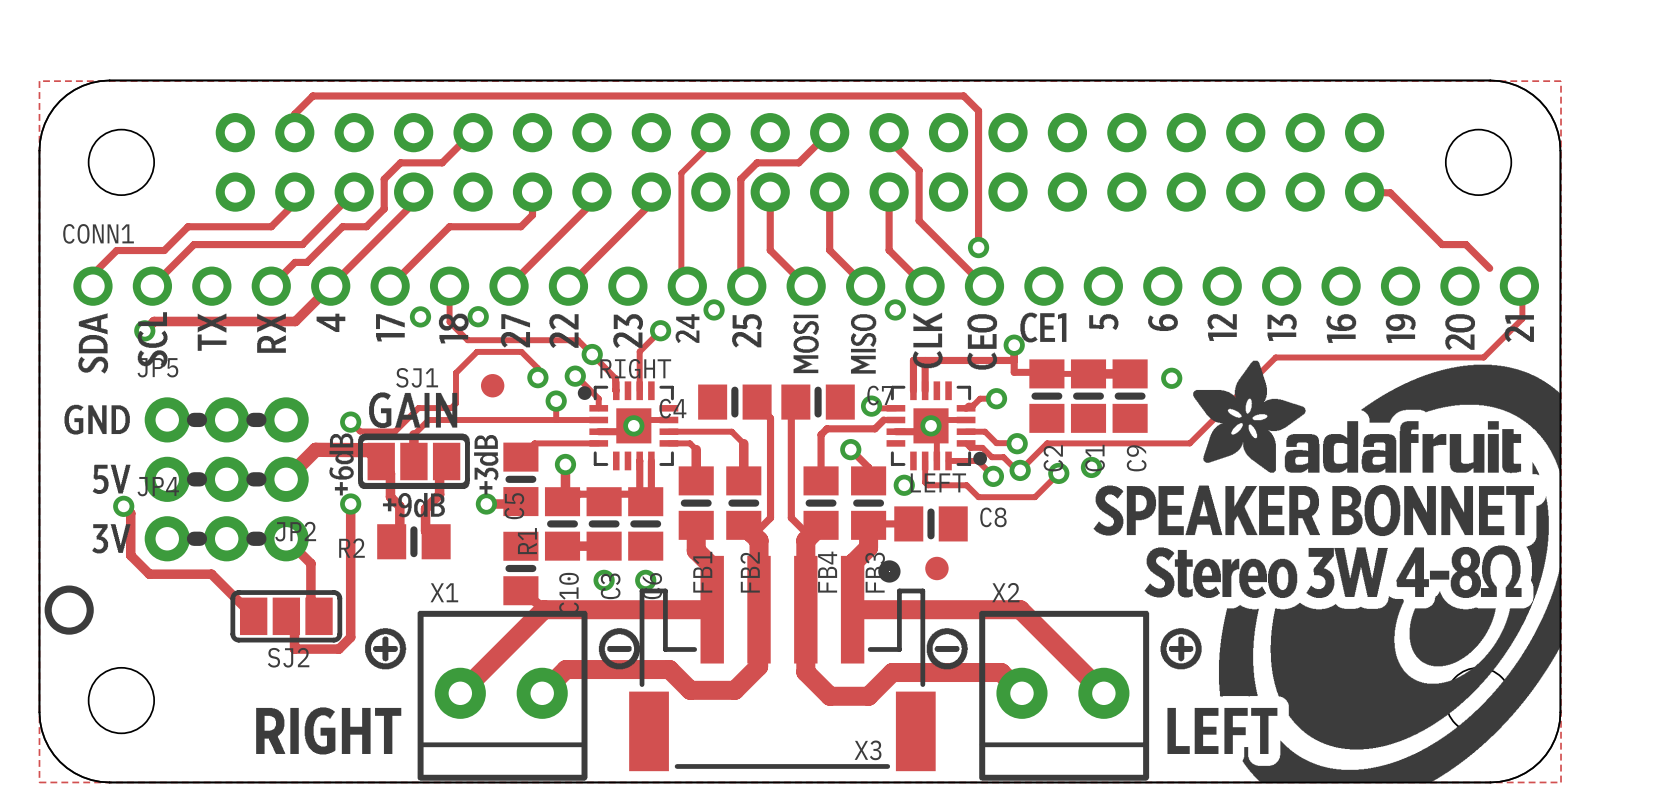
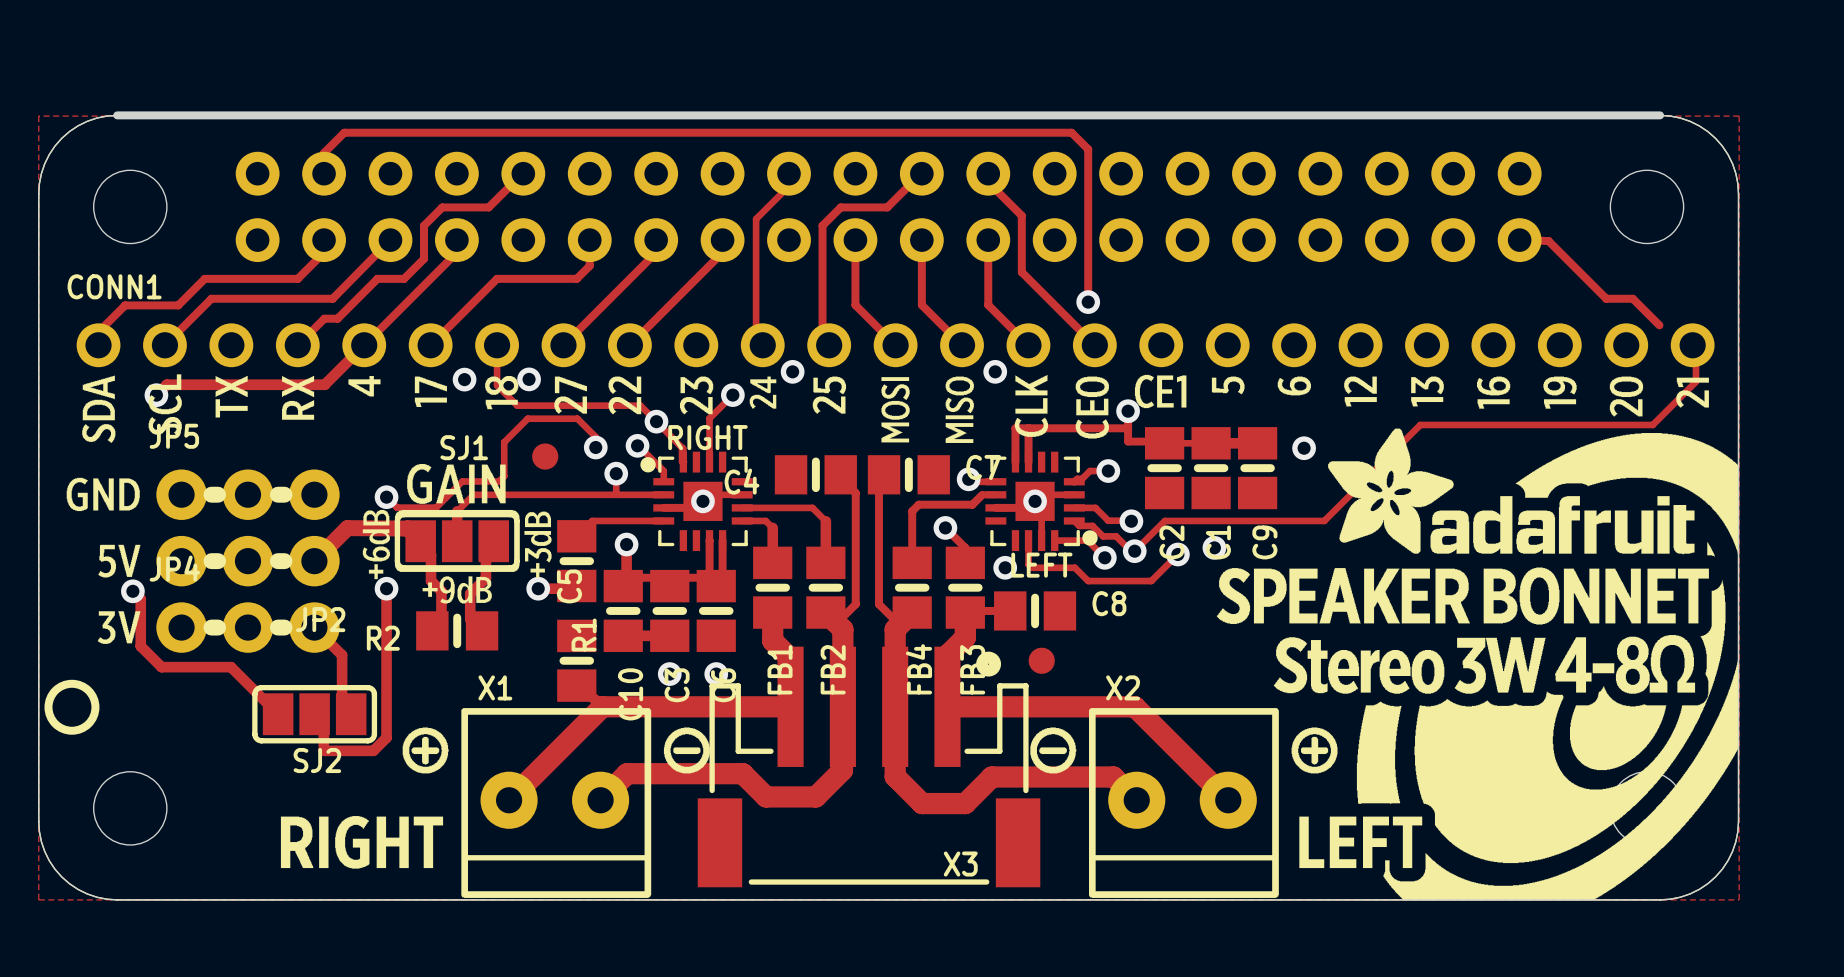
board edge width: thin (109, 80) (1490, 80) -> thick (117, 115) (1660, 115)

